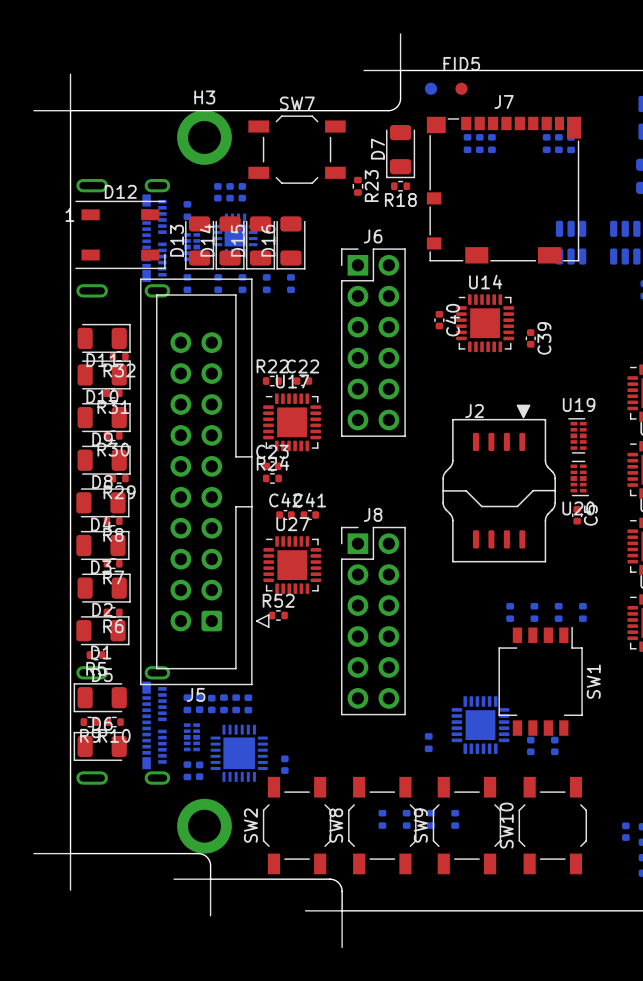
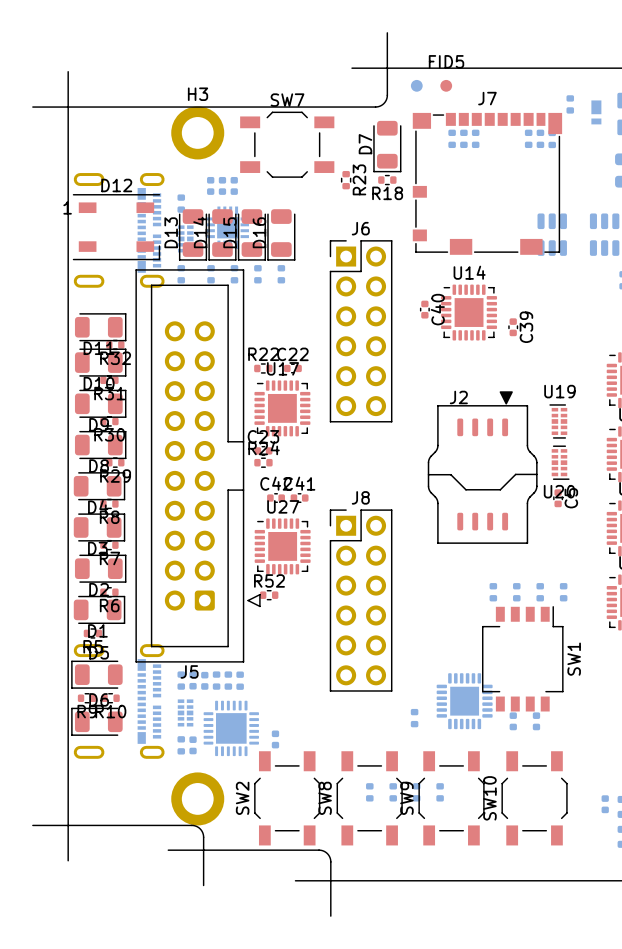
part: none -> (570, 104)
part: none -> (596, 112)

